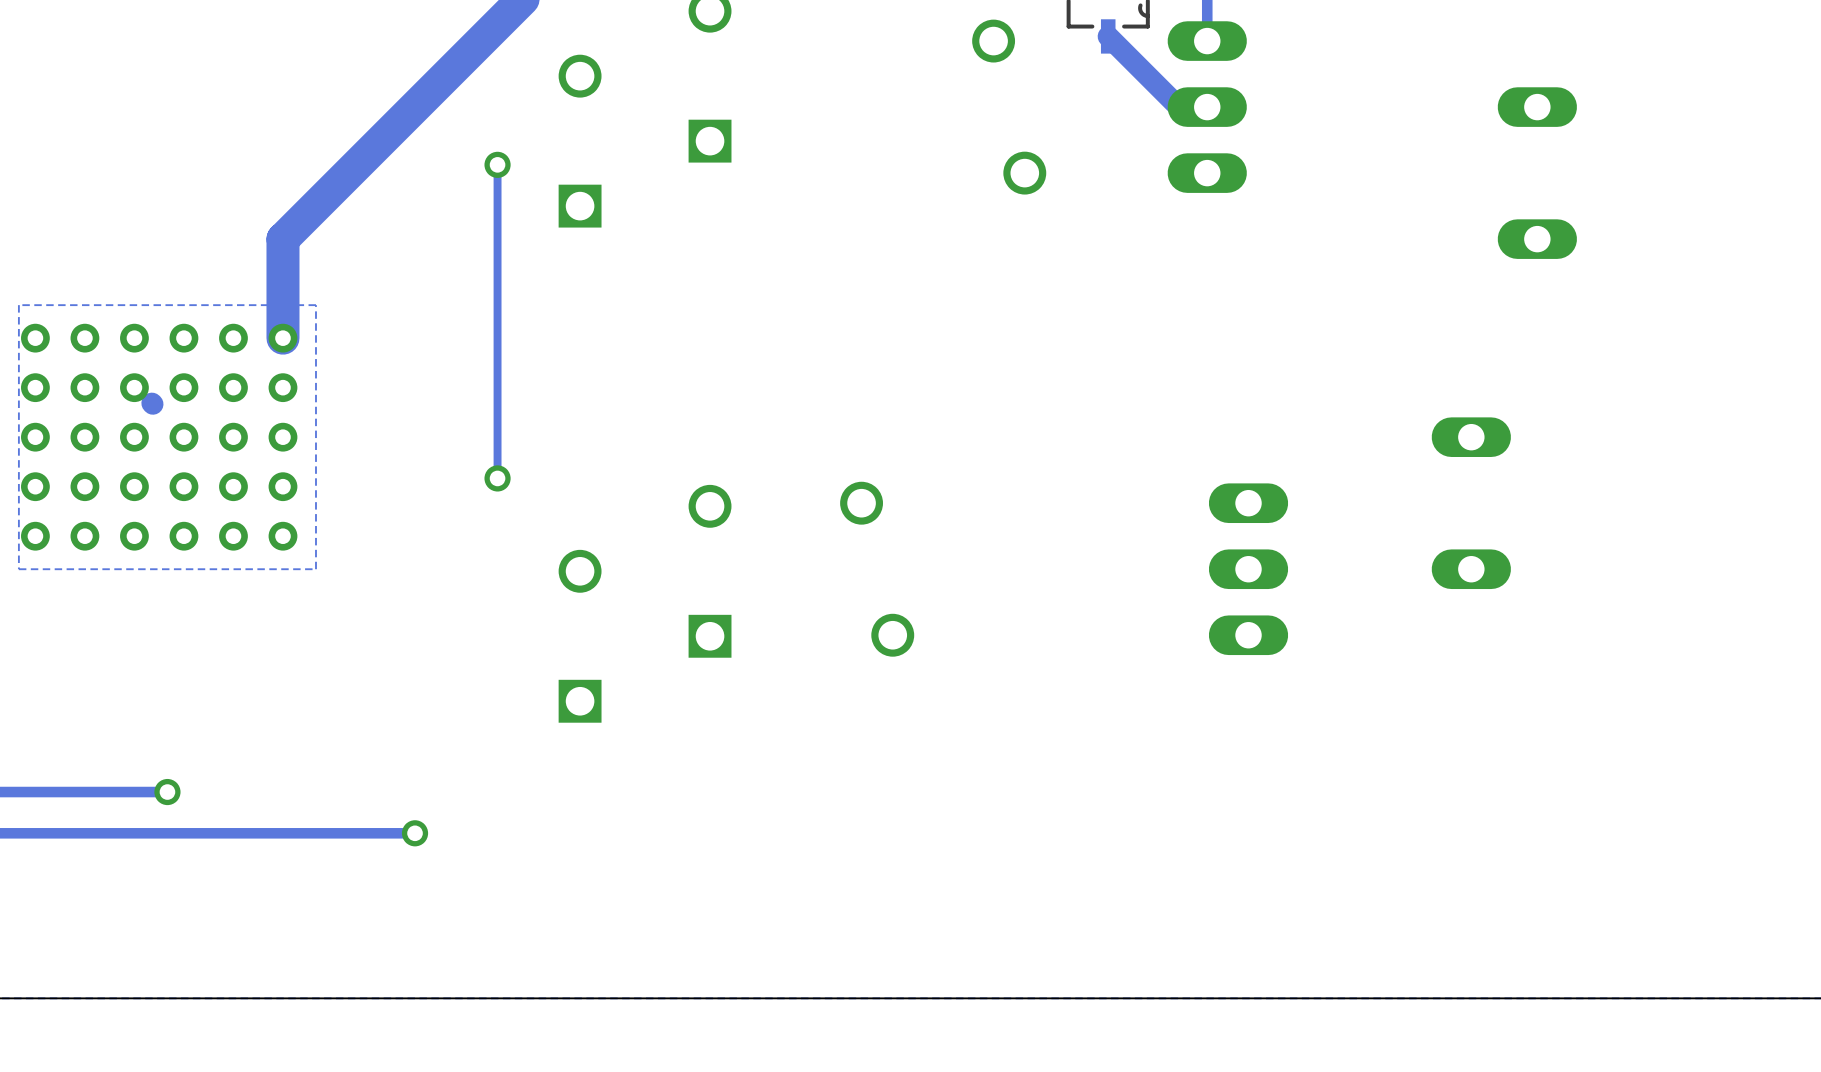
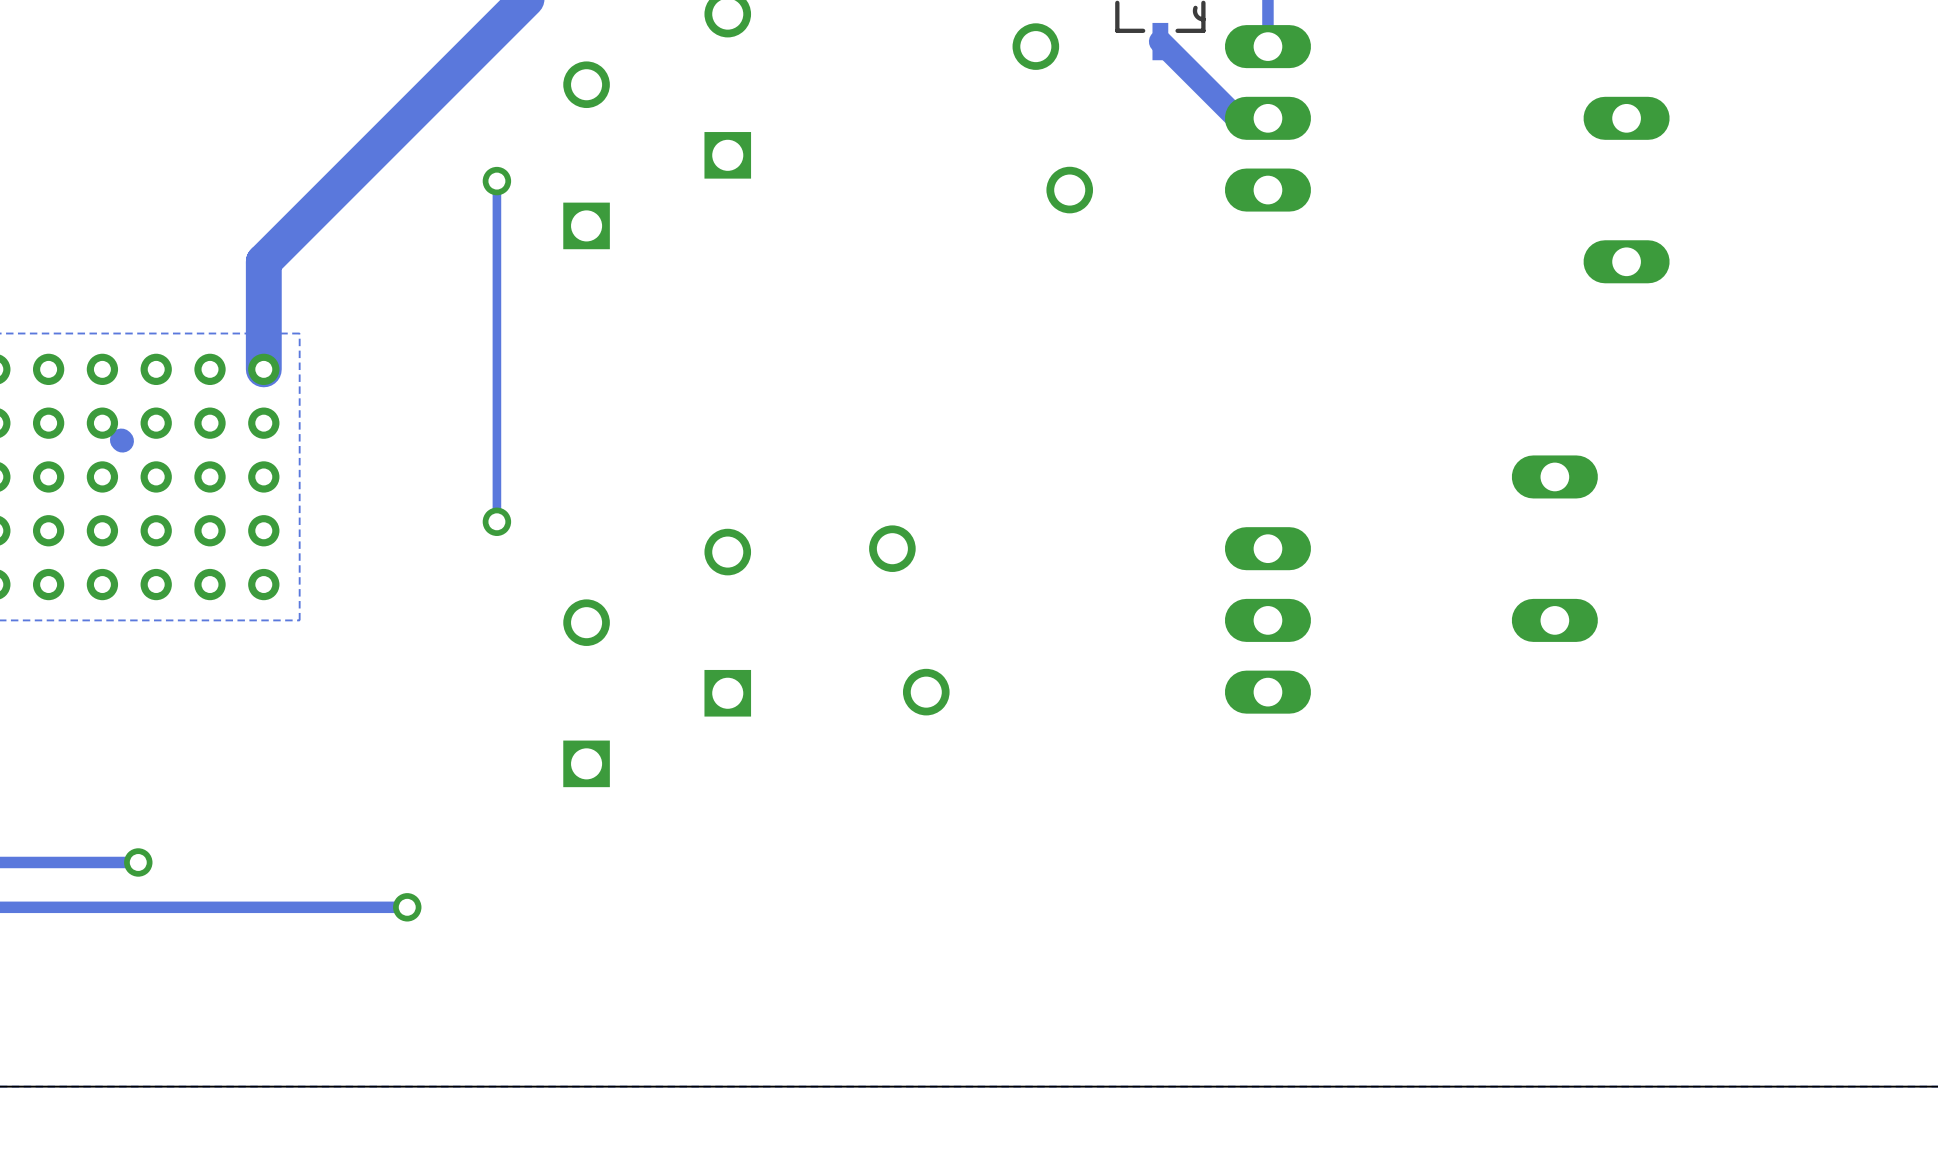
part position: (1248, 569) -> (1267, 620)

